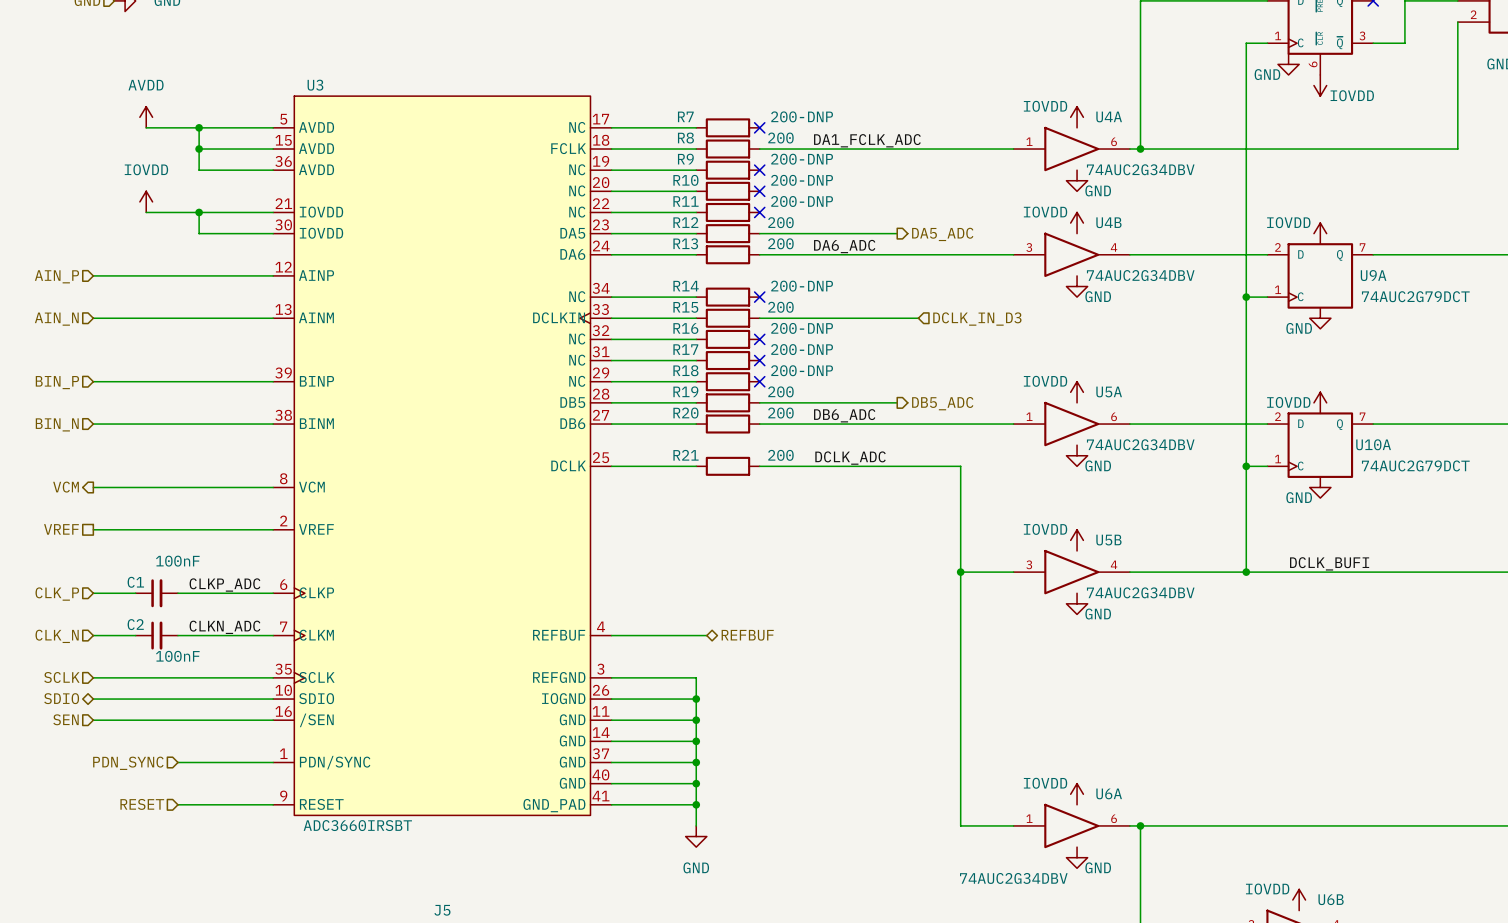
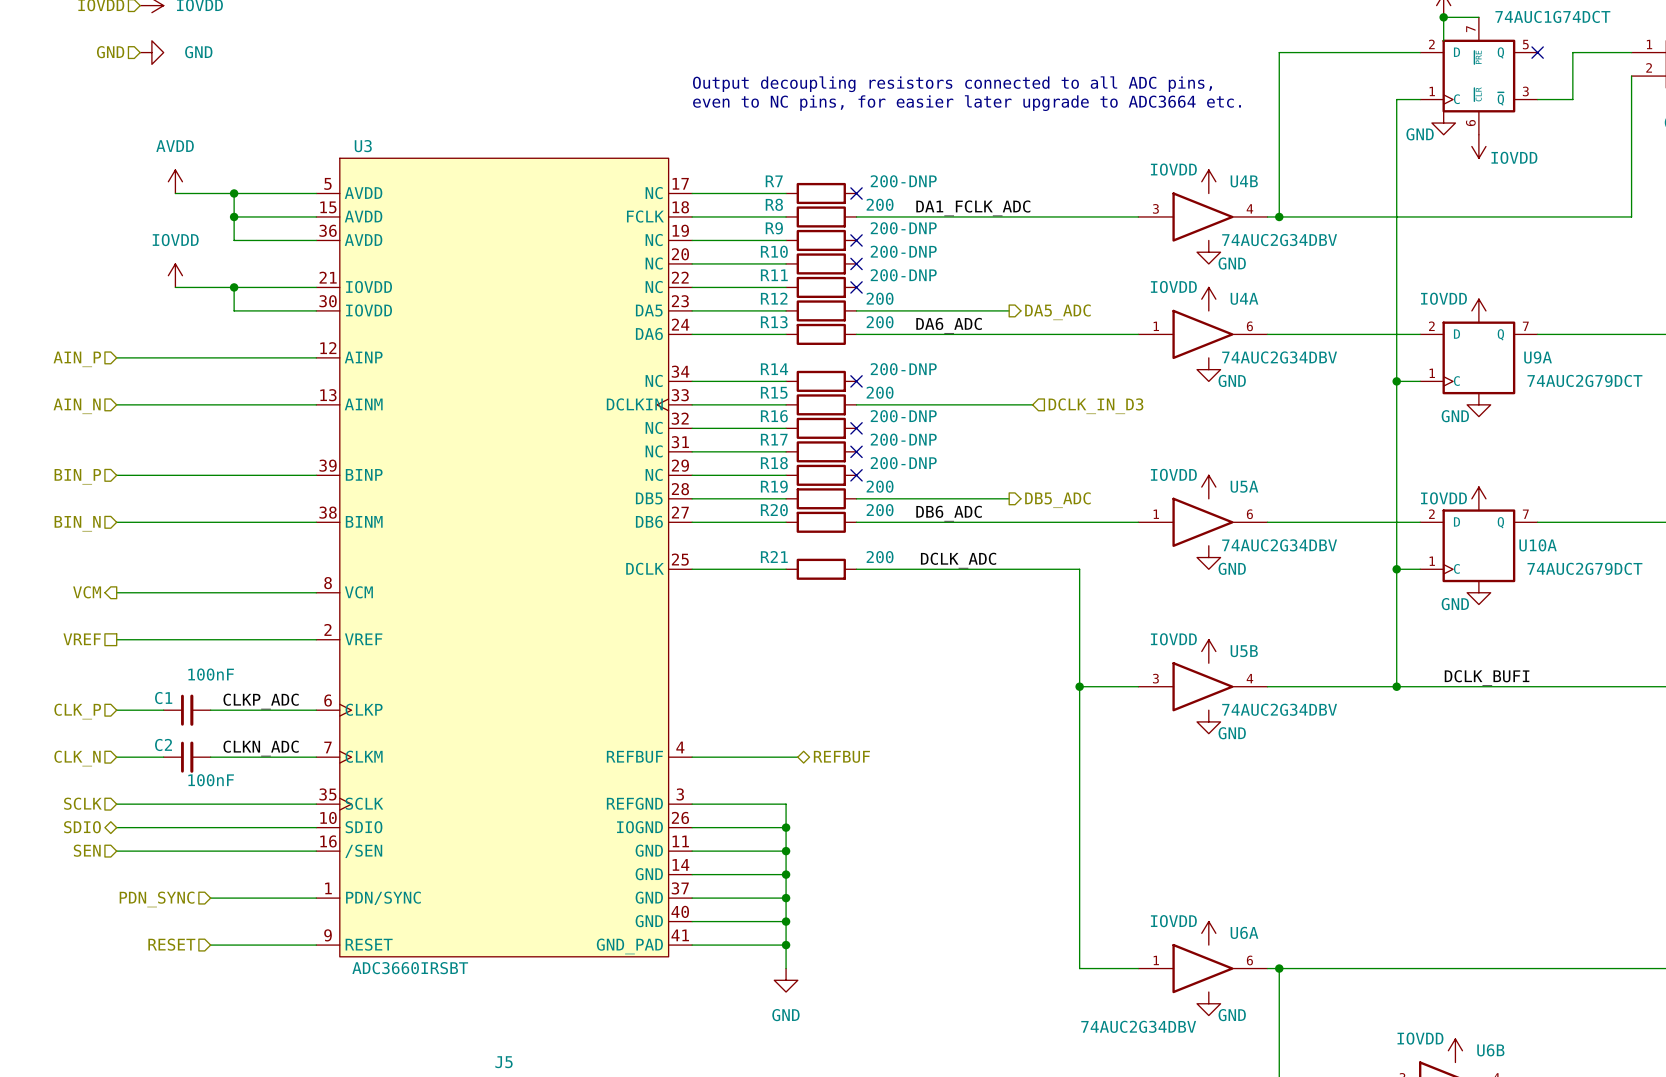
text: none -> Output decoupling resistors connected to all ADC pins, (952, 84)
text: none -> even to NC pins, for easier later upgrade to ADC3664 etc. (967, 103)
U4A position: (1071, 149) -> (1202, 334)
U4B position: (1071, 254) -> (1202, 216)

